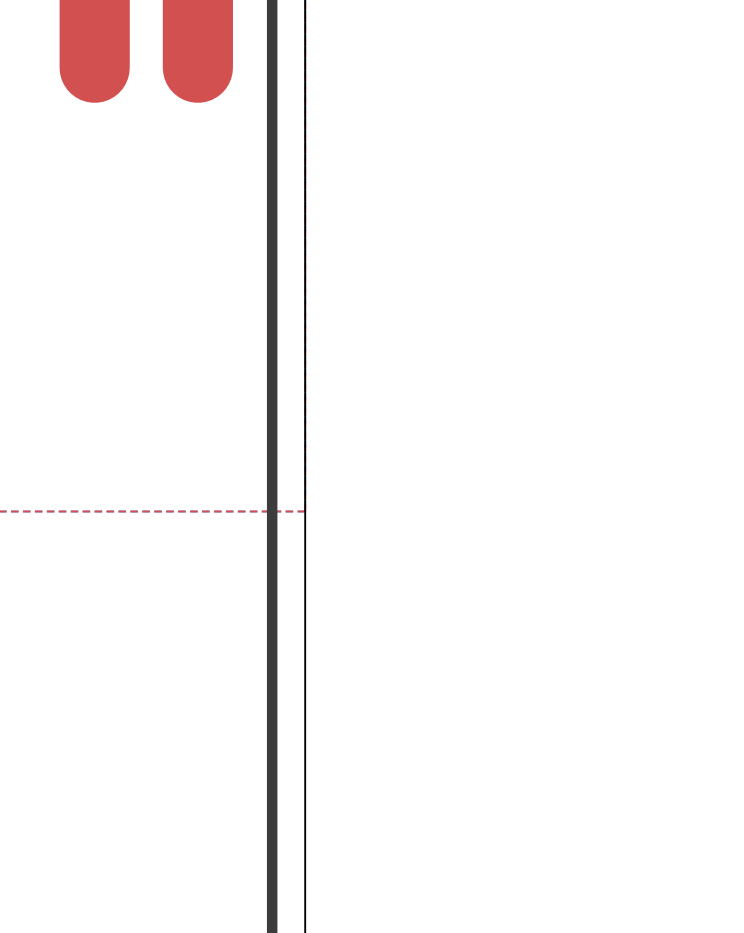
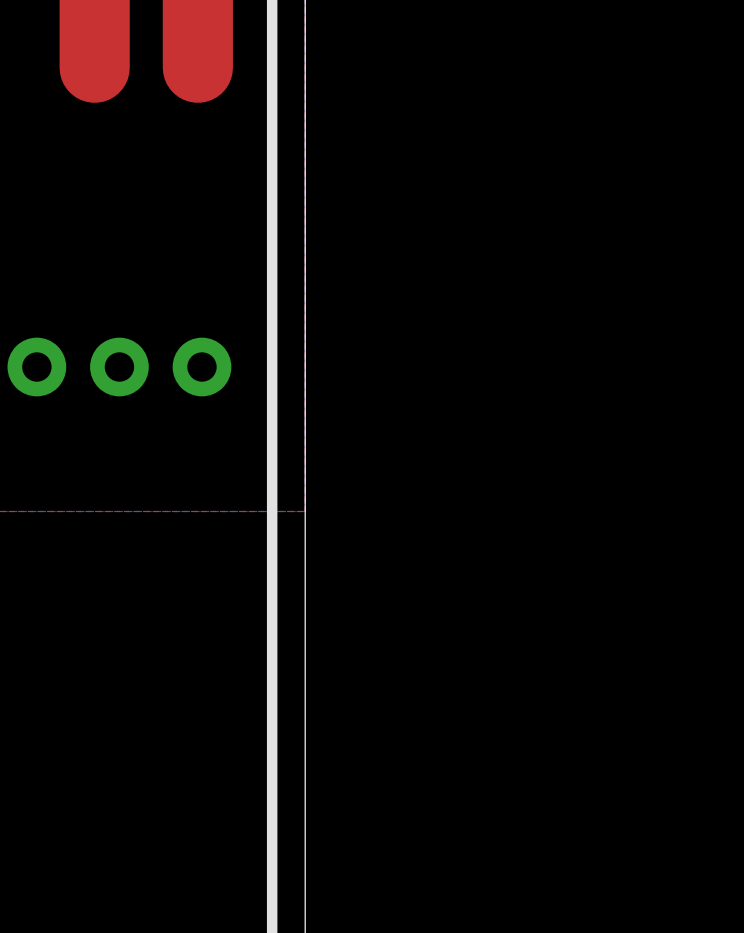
via: none -> (36, 367)
via: none -> (119, 367)
via: none -> (202, 367)

